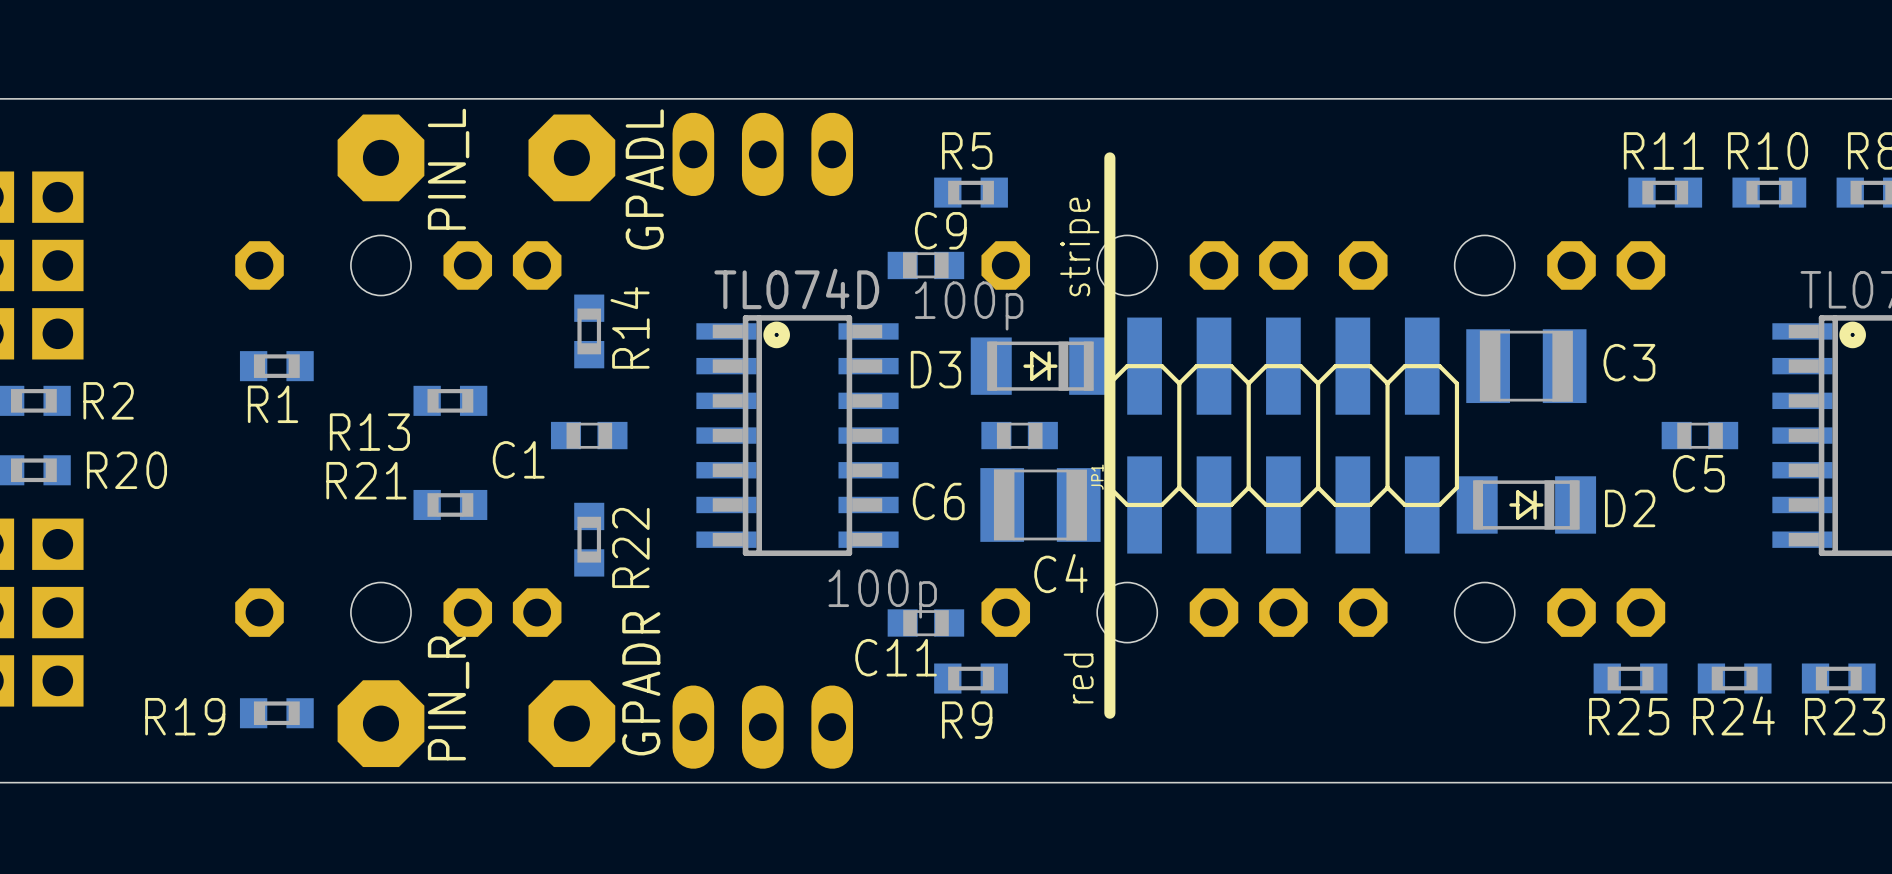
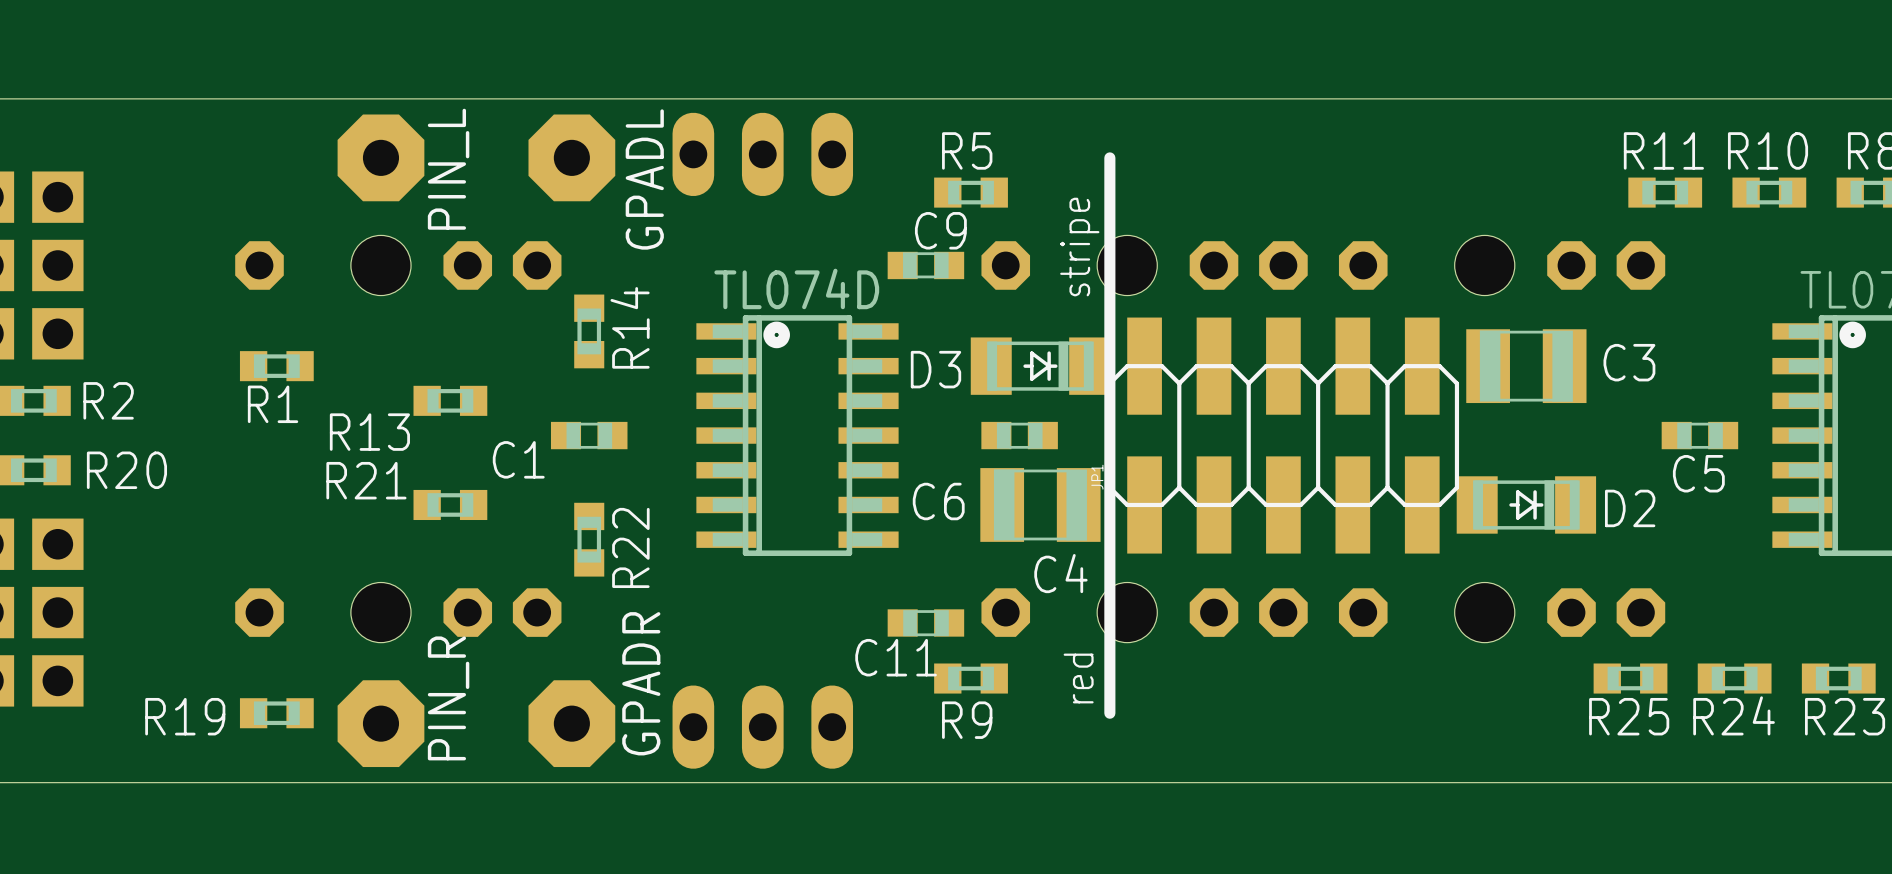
C9 value: 100p (969, 305) -> none
C11 value: 100p (882, 594) -> none

